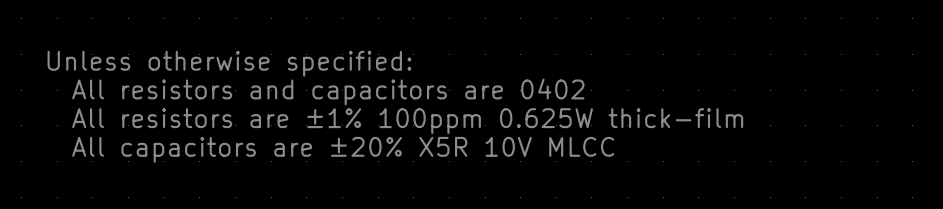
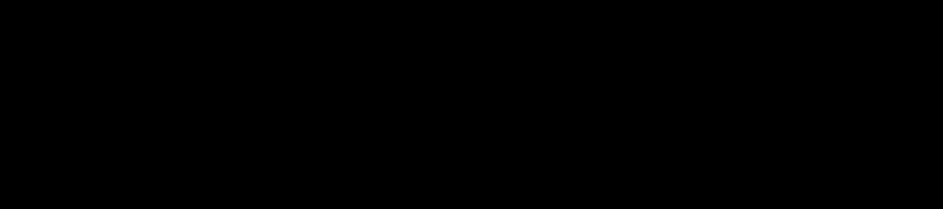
text: Unless otherwise specified: (229, 63) -> none
text: All resistors and capacitors are 0402 (328, 92) -> none
text: All resistors are ±1% 100ppm 0.625W thick-film (407, 121) -> none
text: All capacitors are ±20% X5R 10V MLCC (343, 149) -> none

